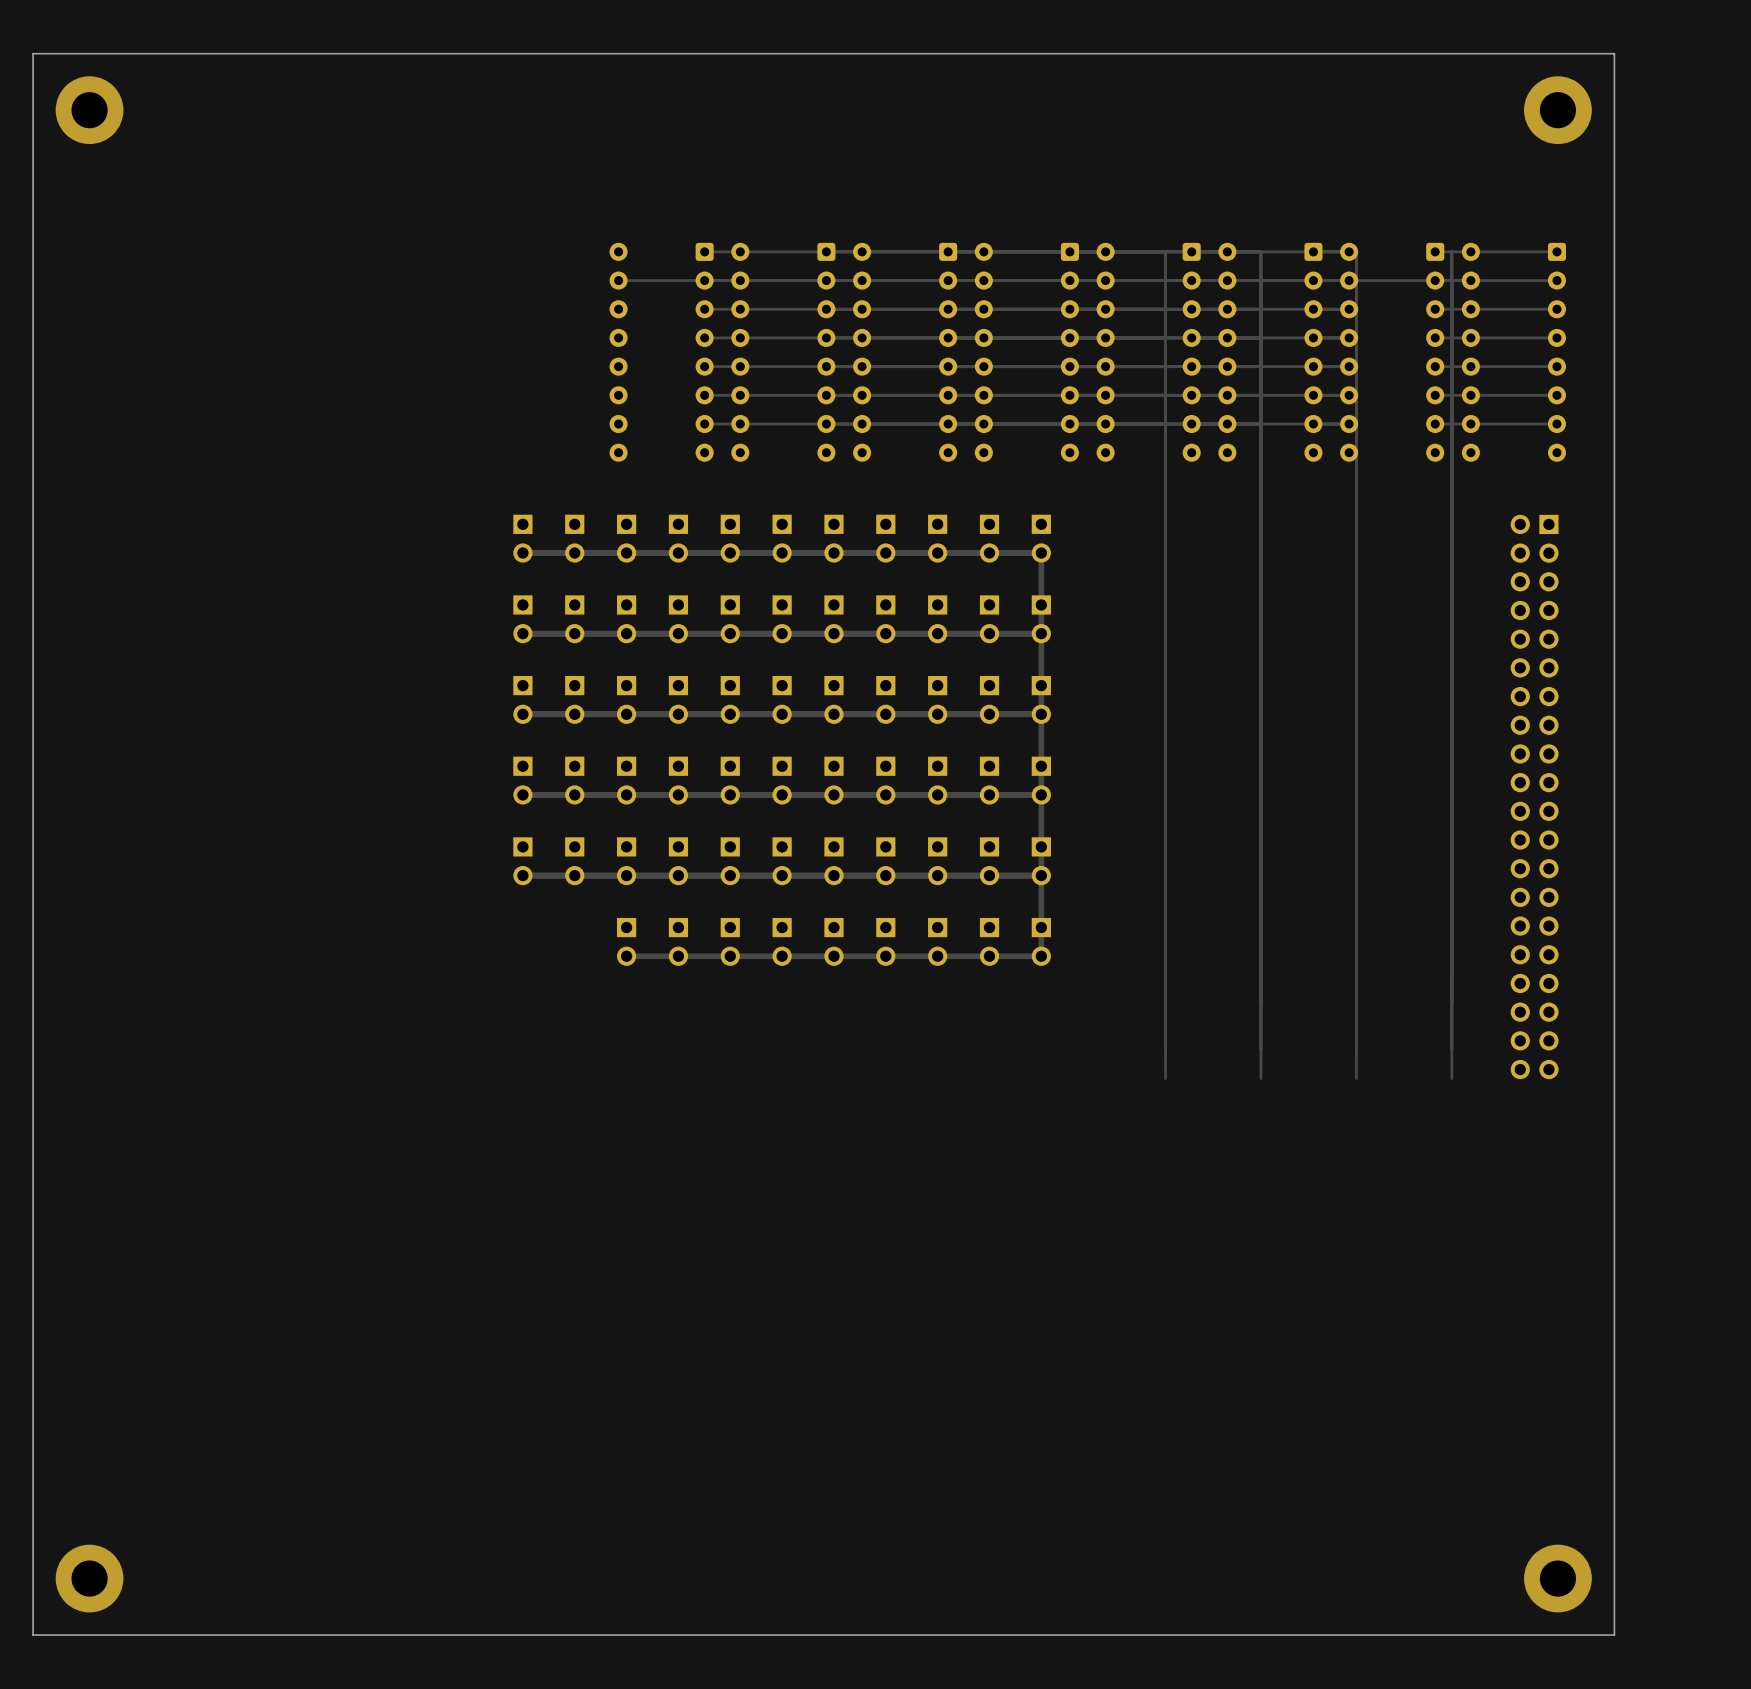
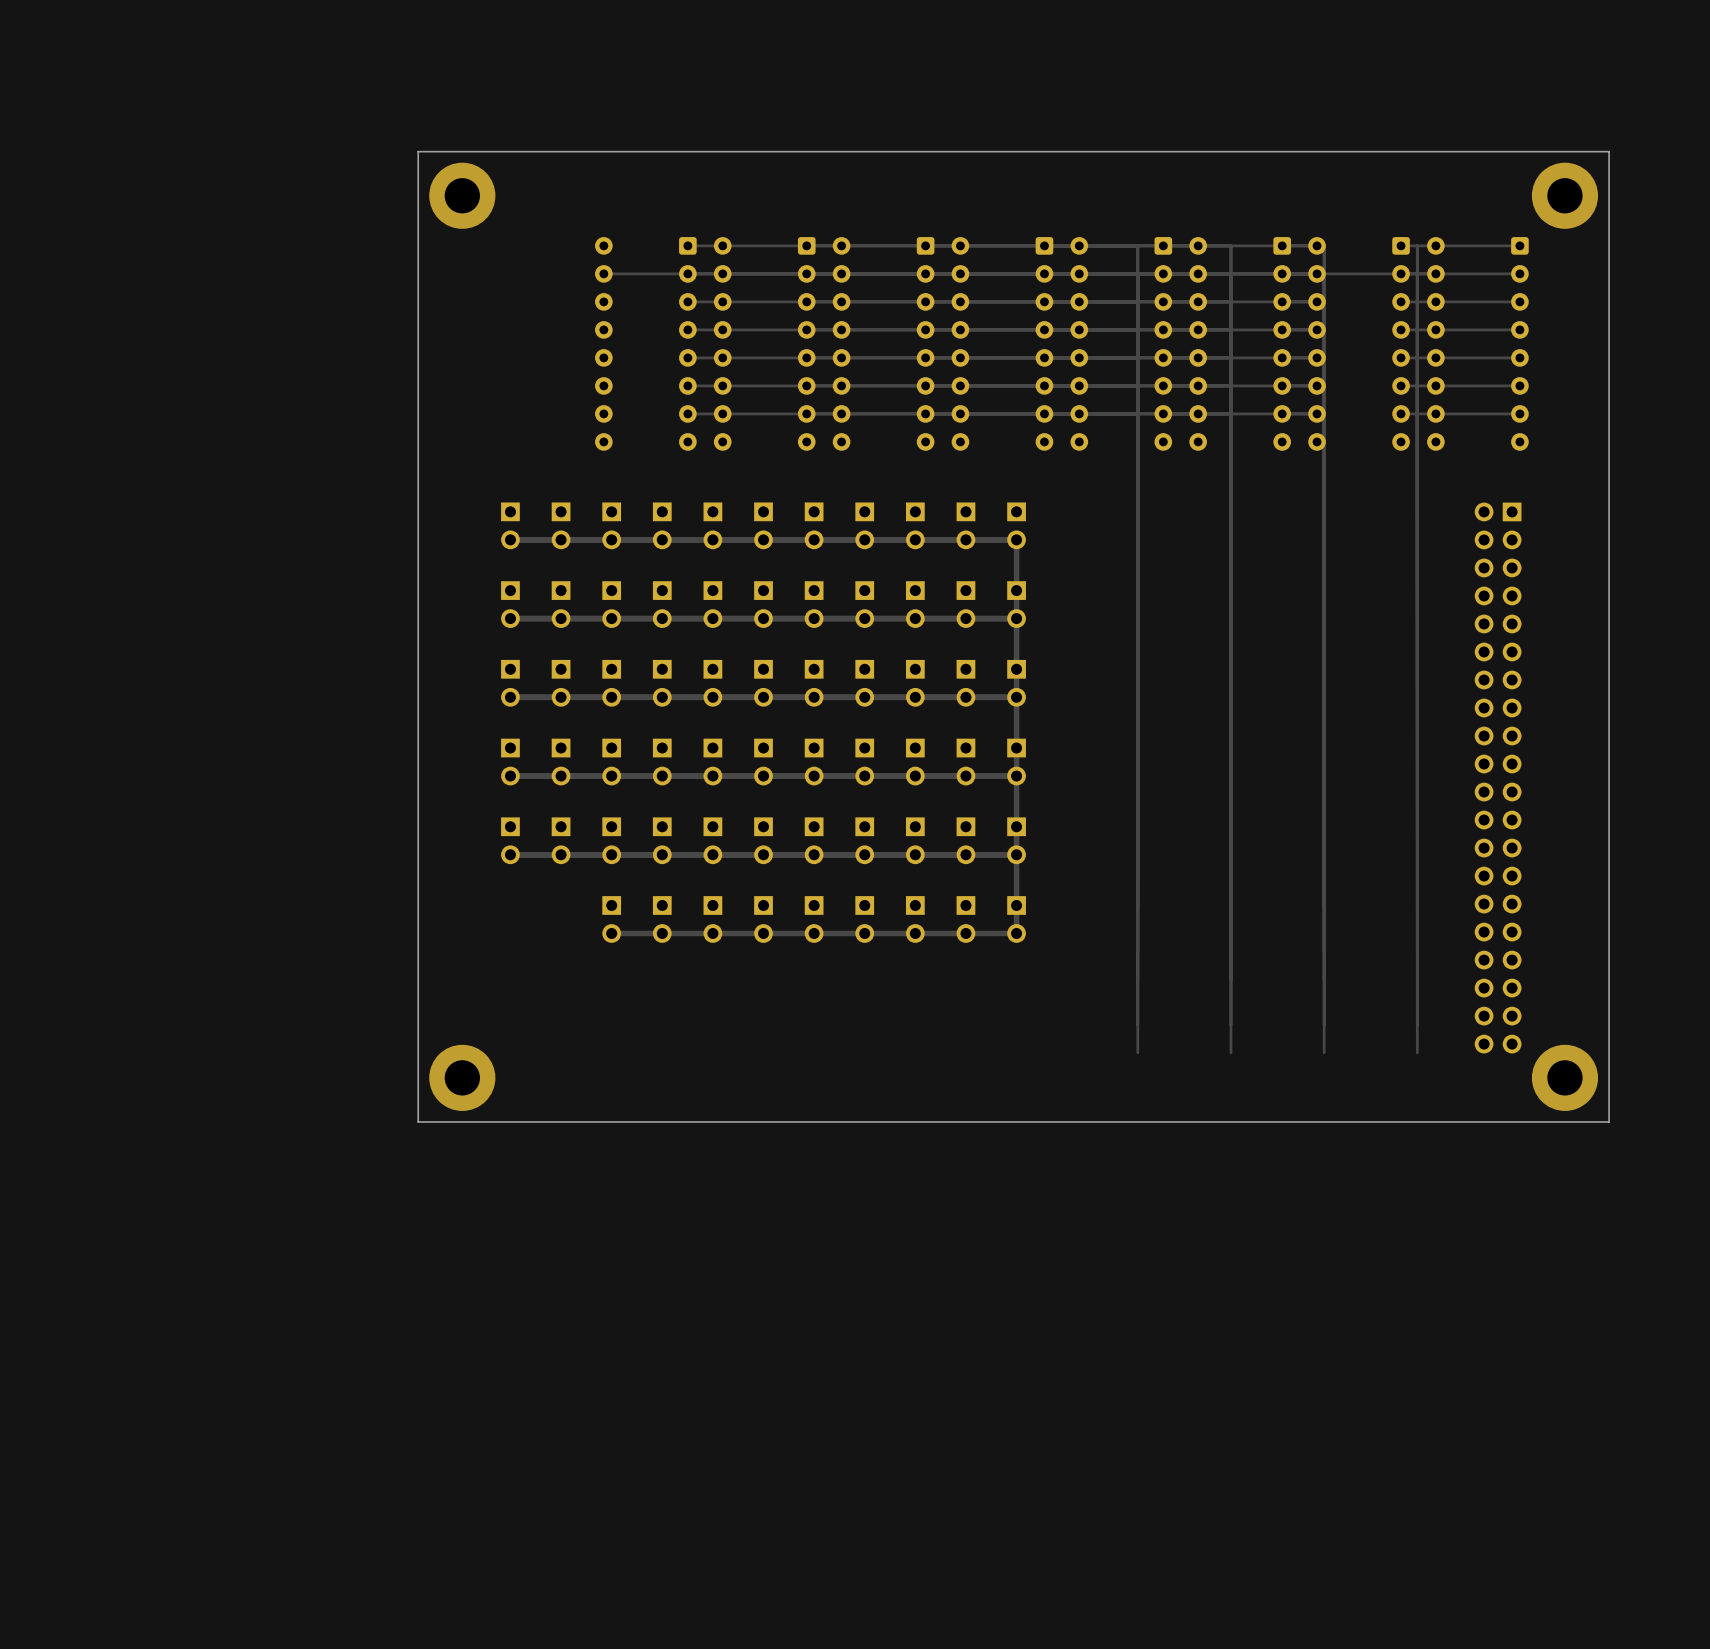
board edge: (1614, 53) (33, 53) (33, 1635) (1614, 1635) (1614, 53) -> none
via: (89, 110) -> none
via: (1557, 110) -> none
board edge: none -> (1609, 151) (418, 151) (418, 1121) (1609, 1121) (1609, 151)
via: none -> (462, 195)
via: none -> (1564, 195)
via: none -> (462, 1077)
via: none -> (1564, 1077)
via: (89, 1578) -> none
via: (1557, 1578) -> none

